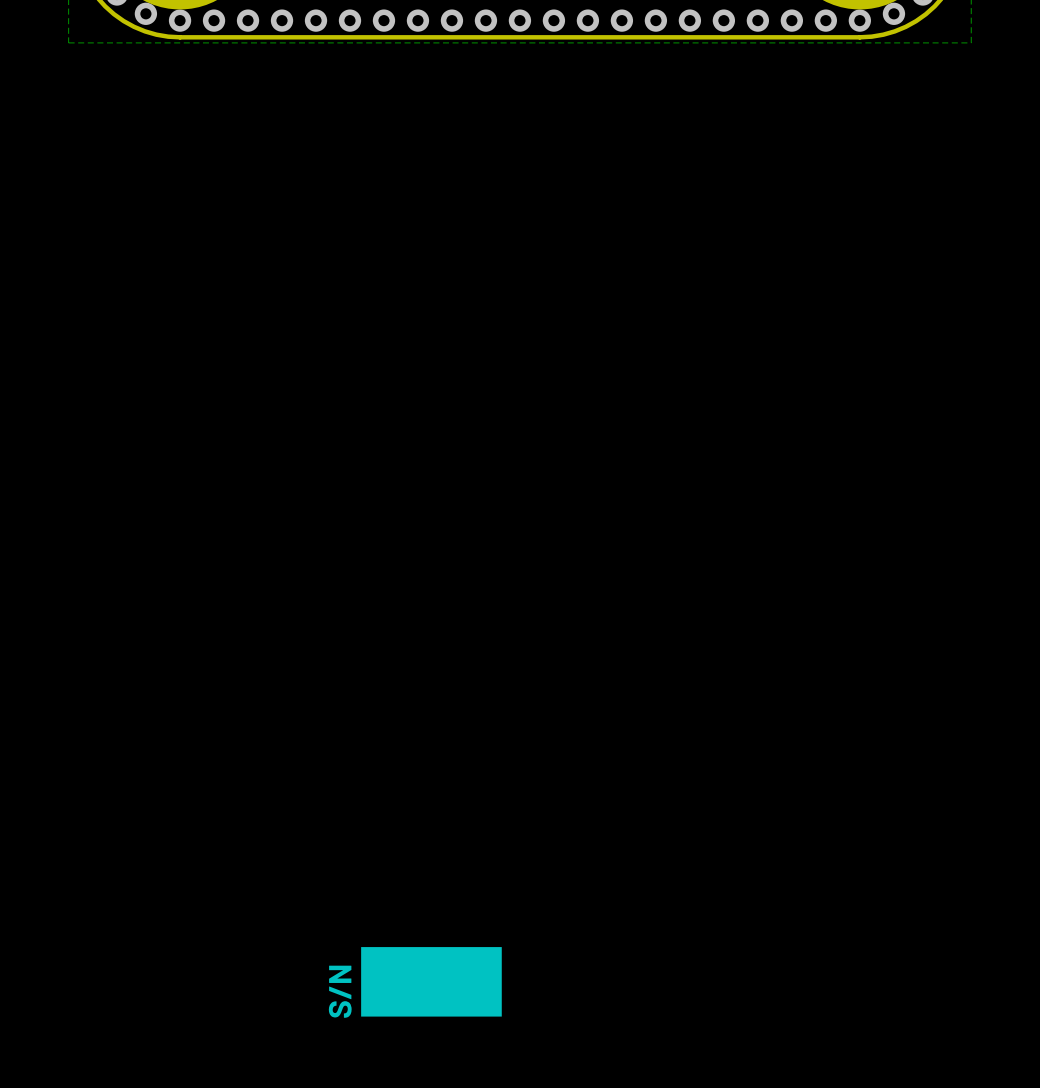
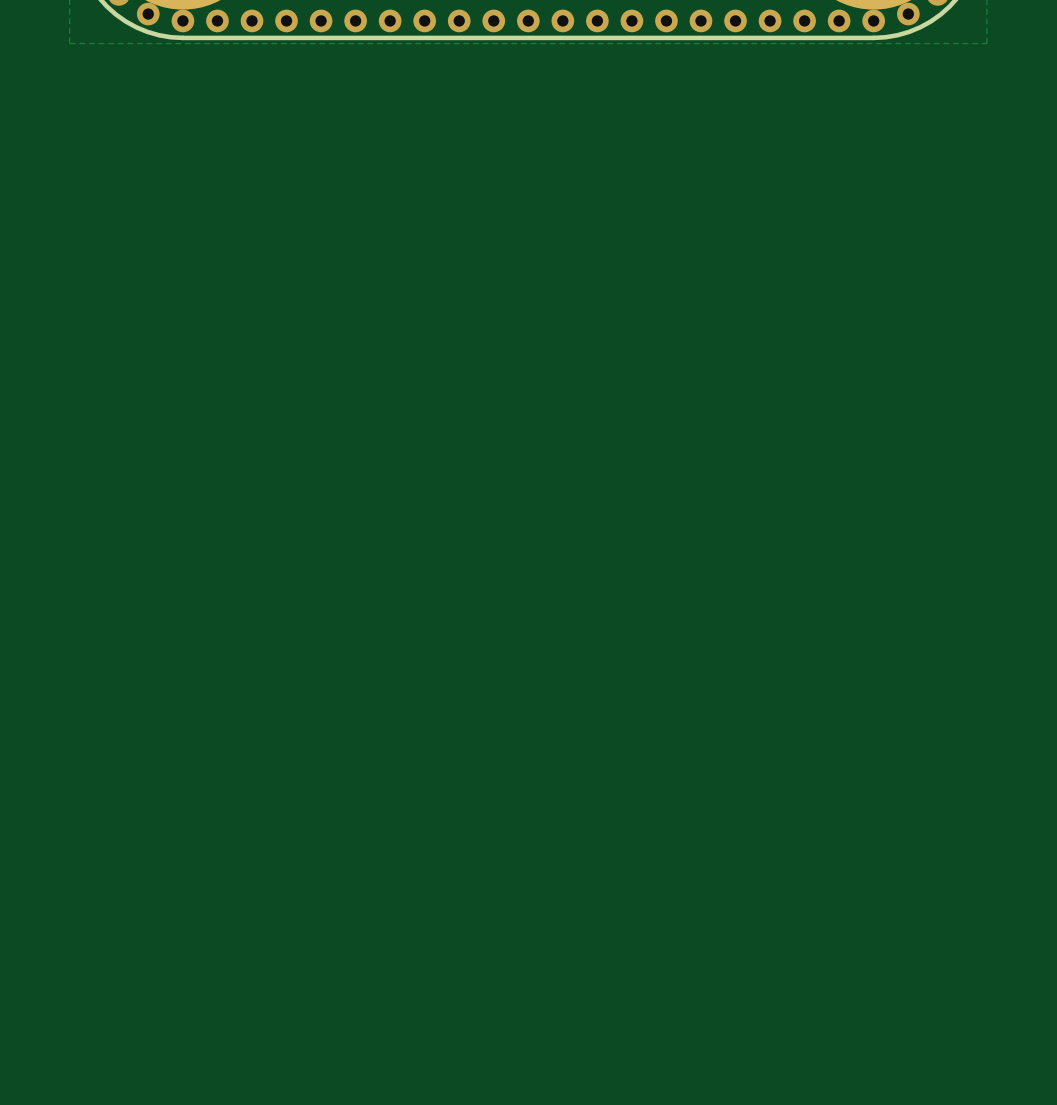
drawing: [361, 947, 502, 1017] -> none
text: S/N (340, 991) -> none

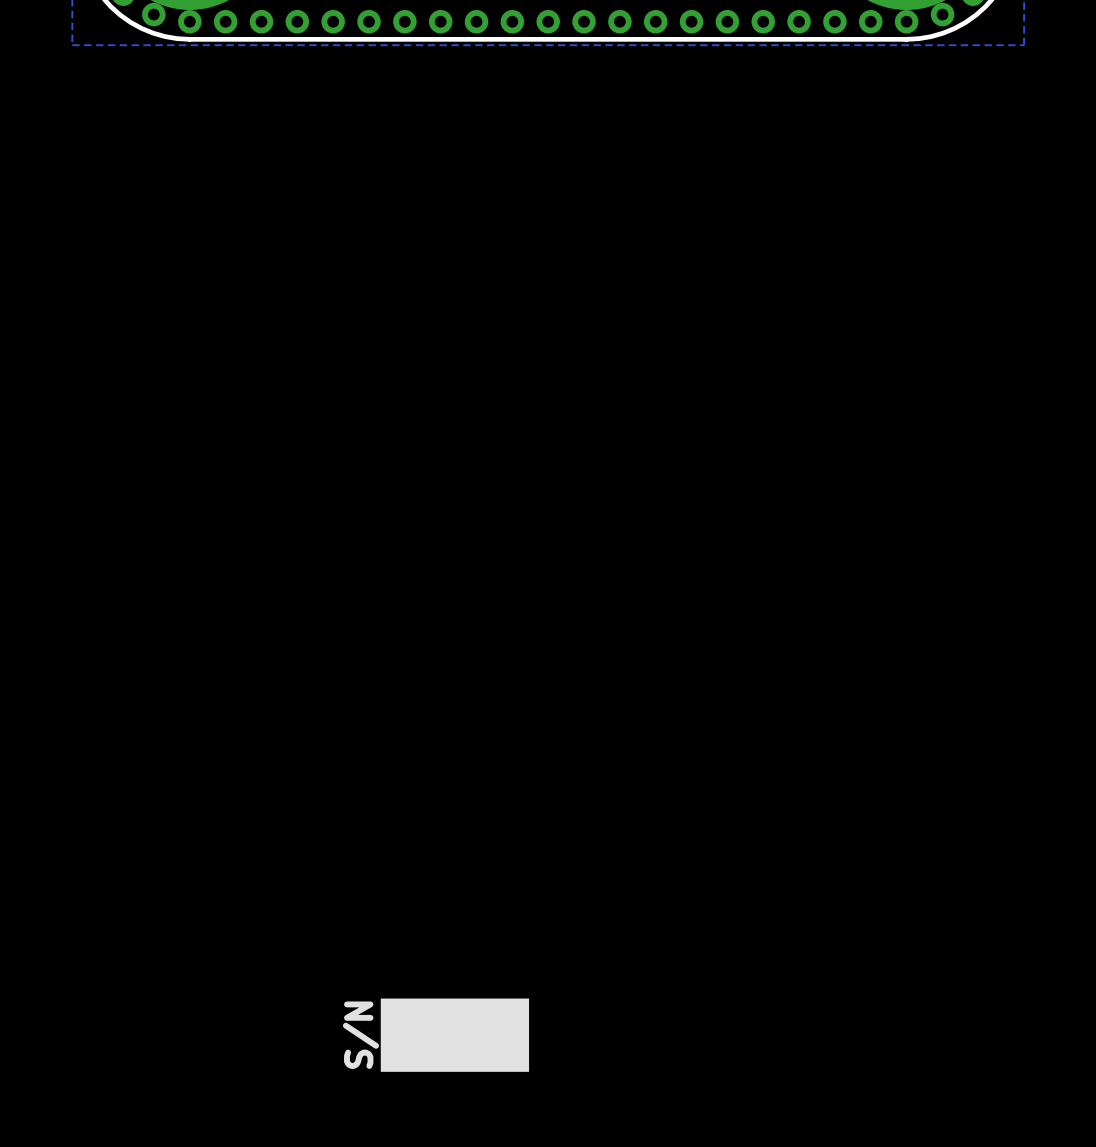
drawing: none -> [380, 998, 530, 1072]
text: none -> S/N (360, 1035)

